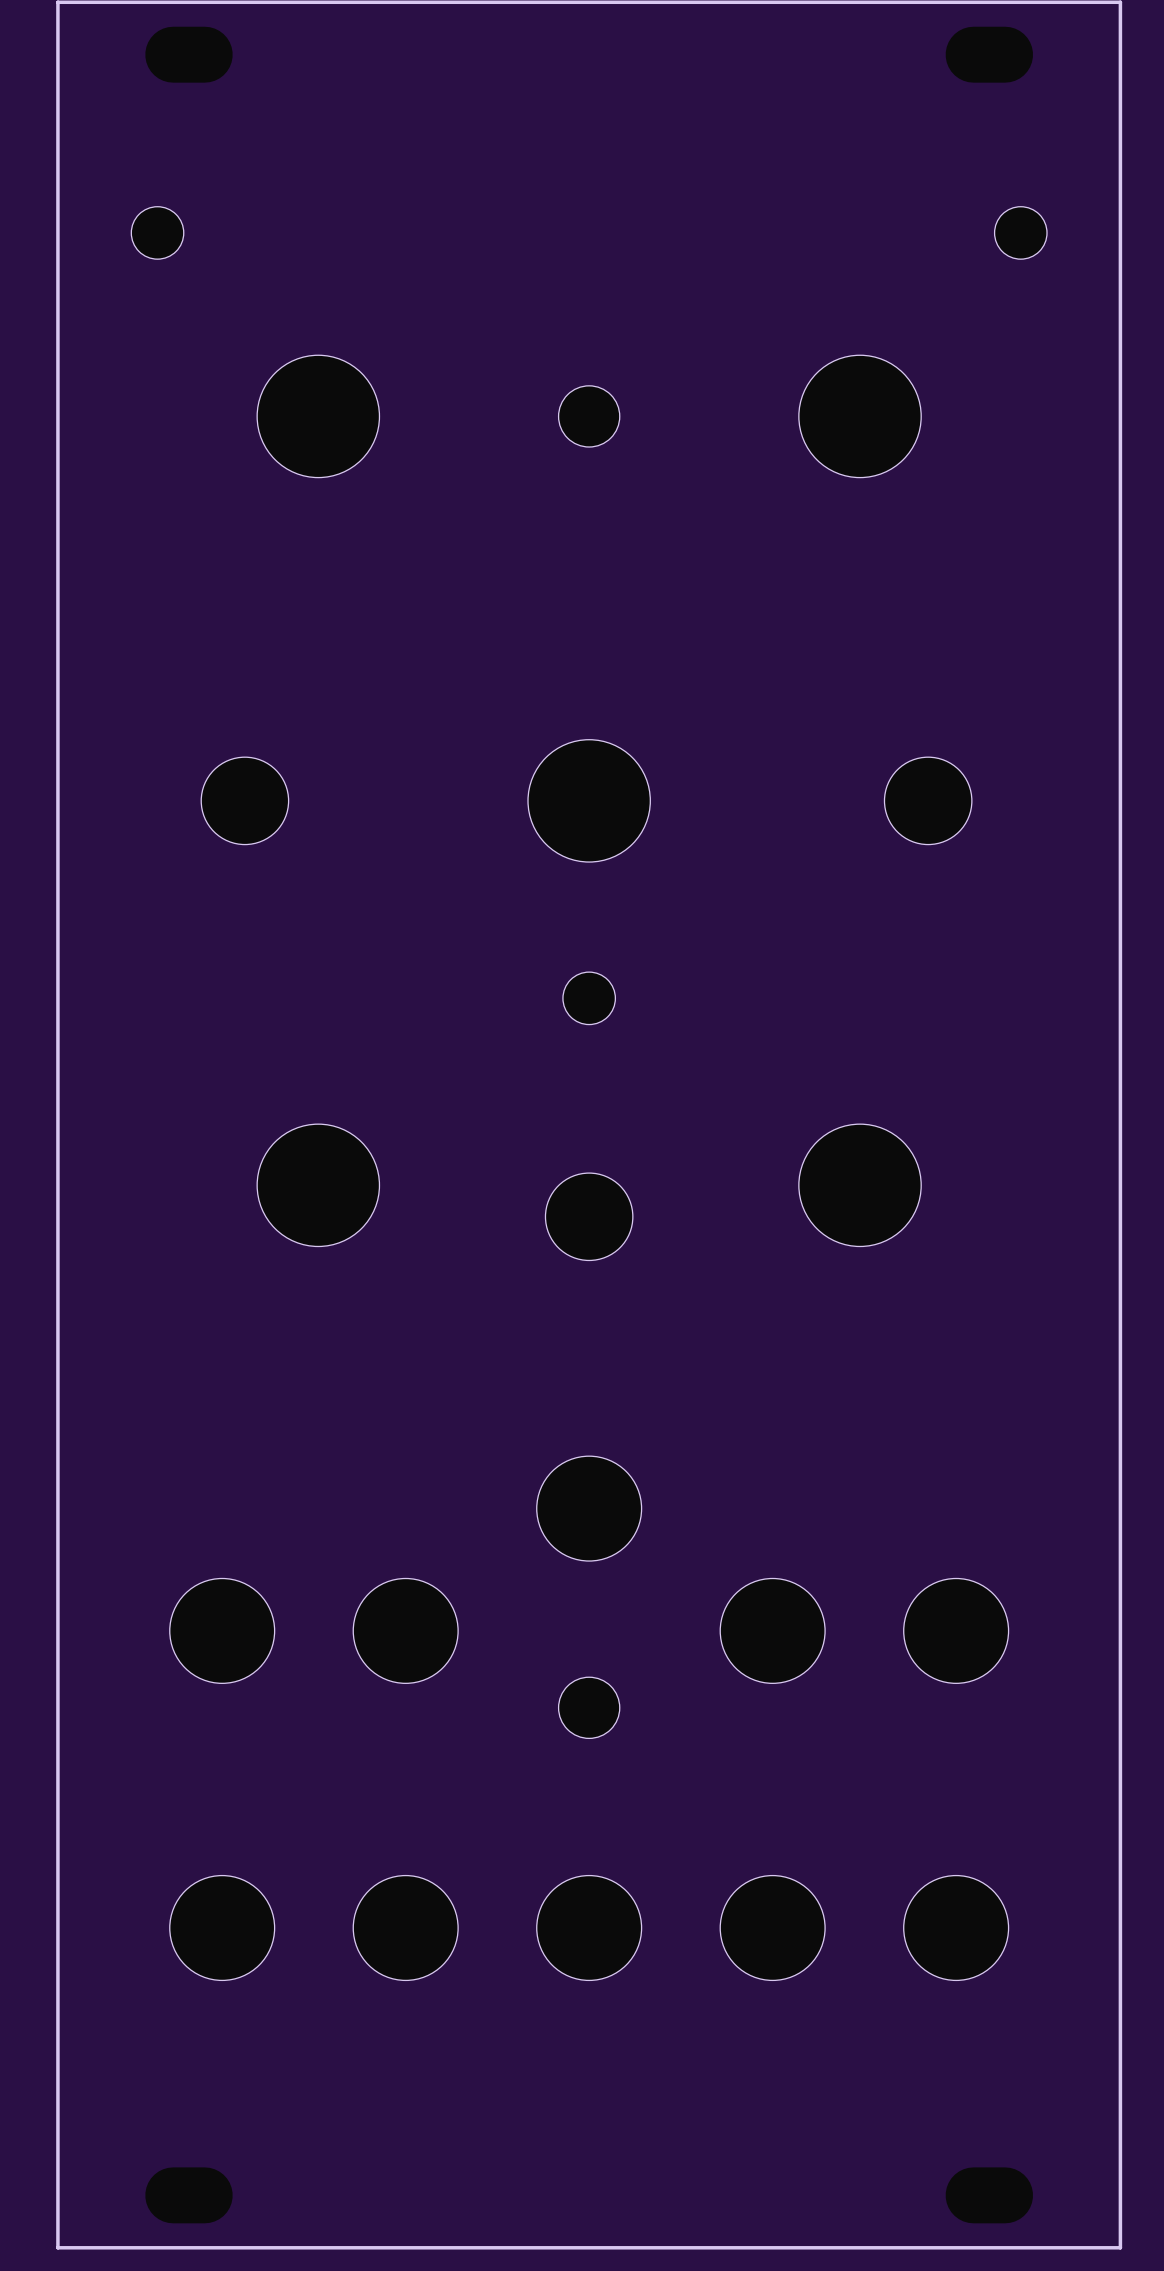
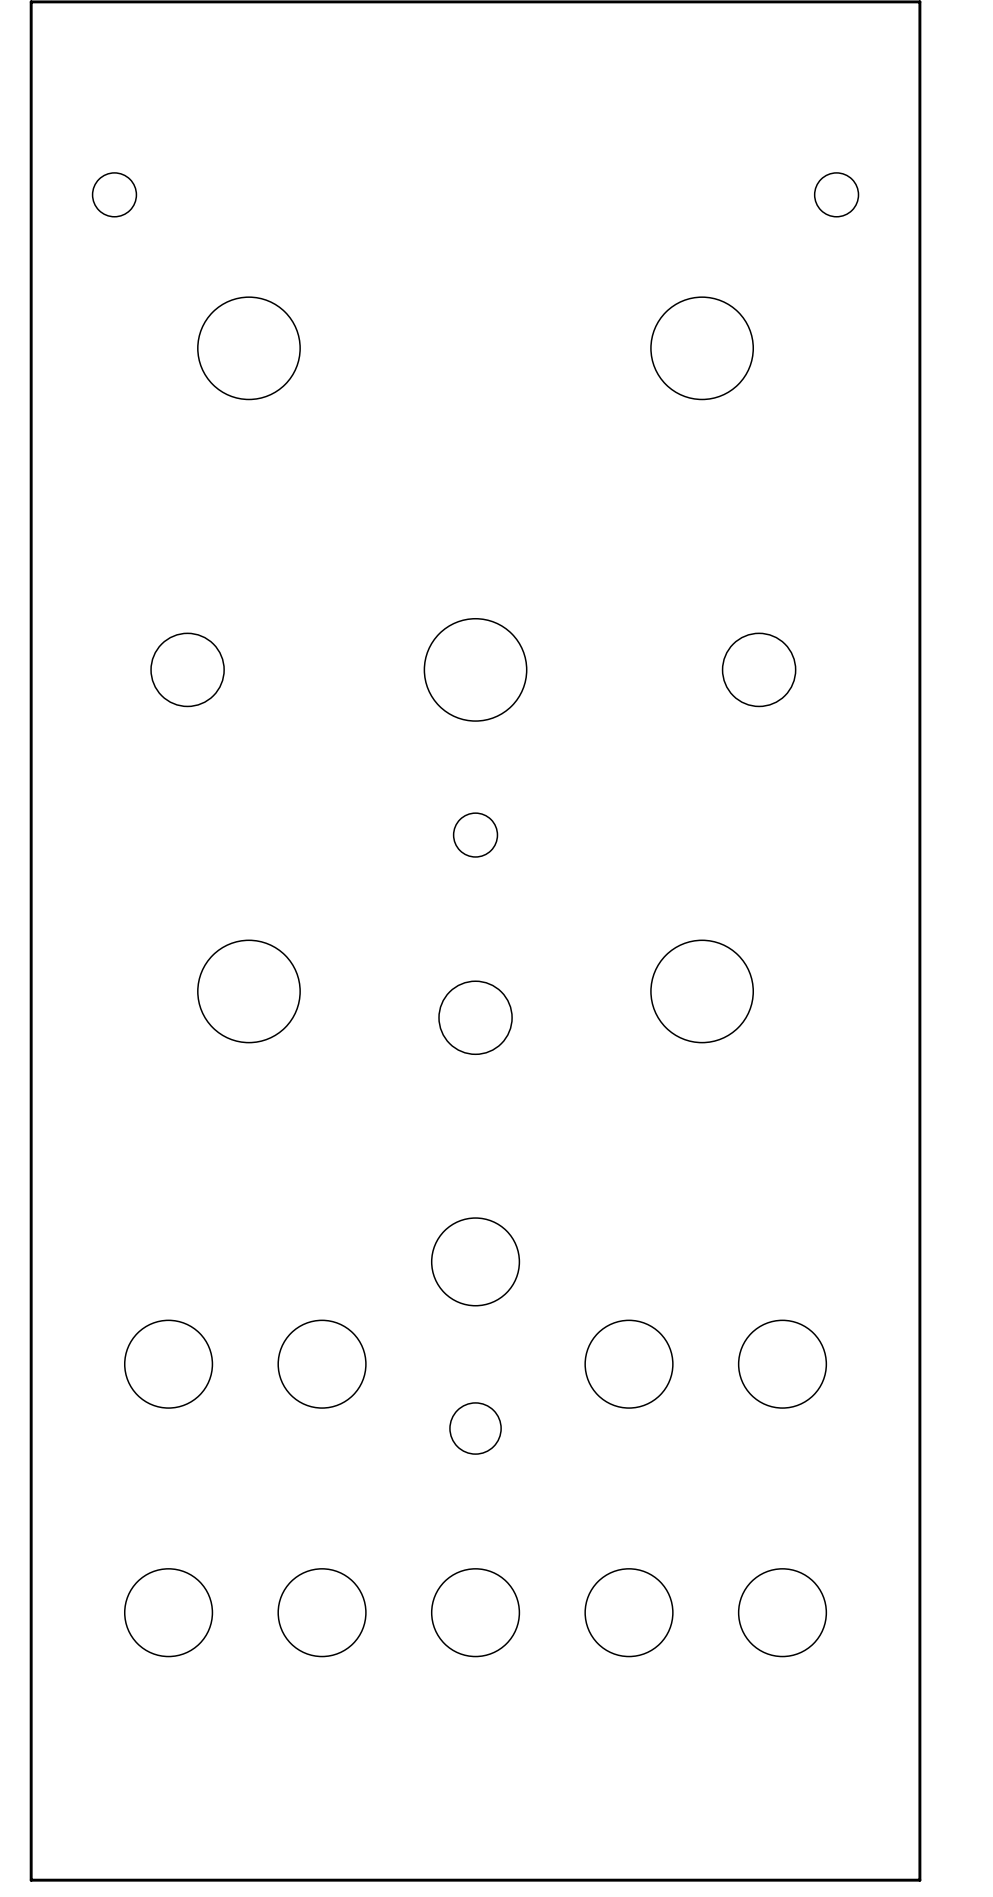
part: (589, 416) -> none

